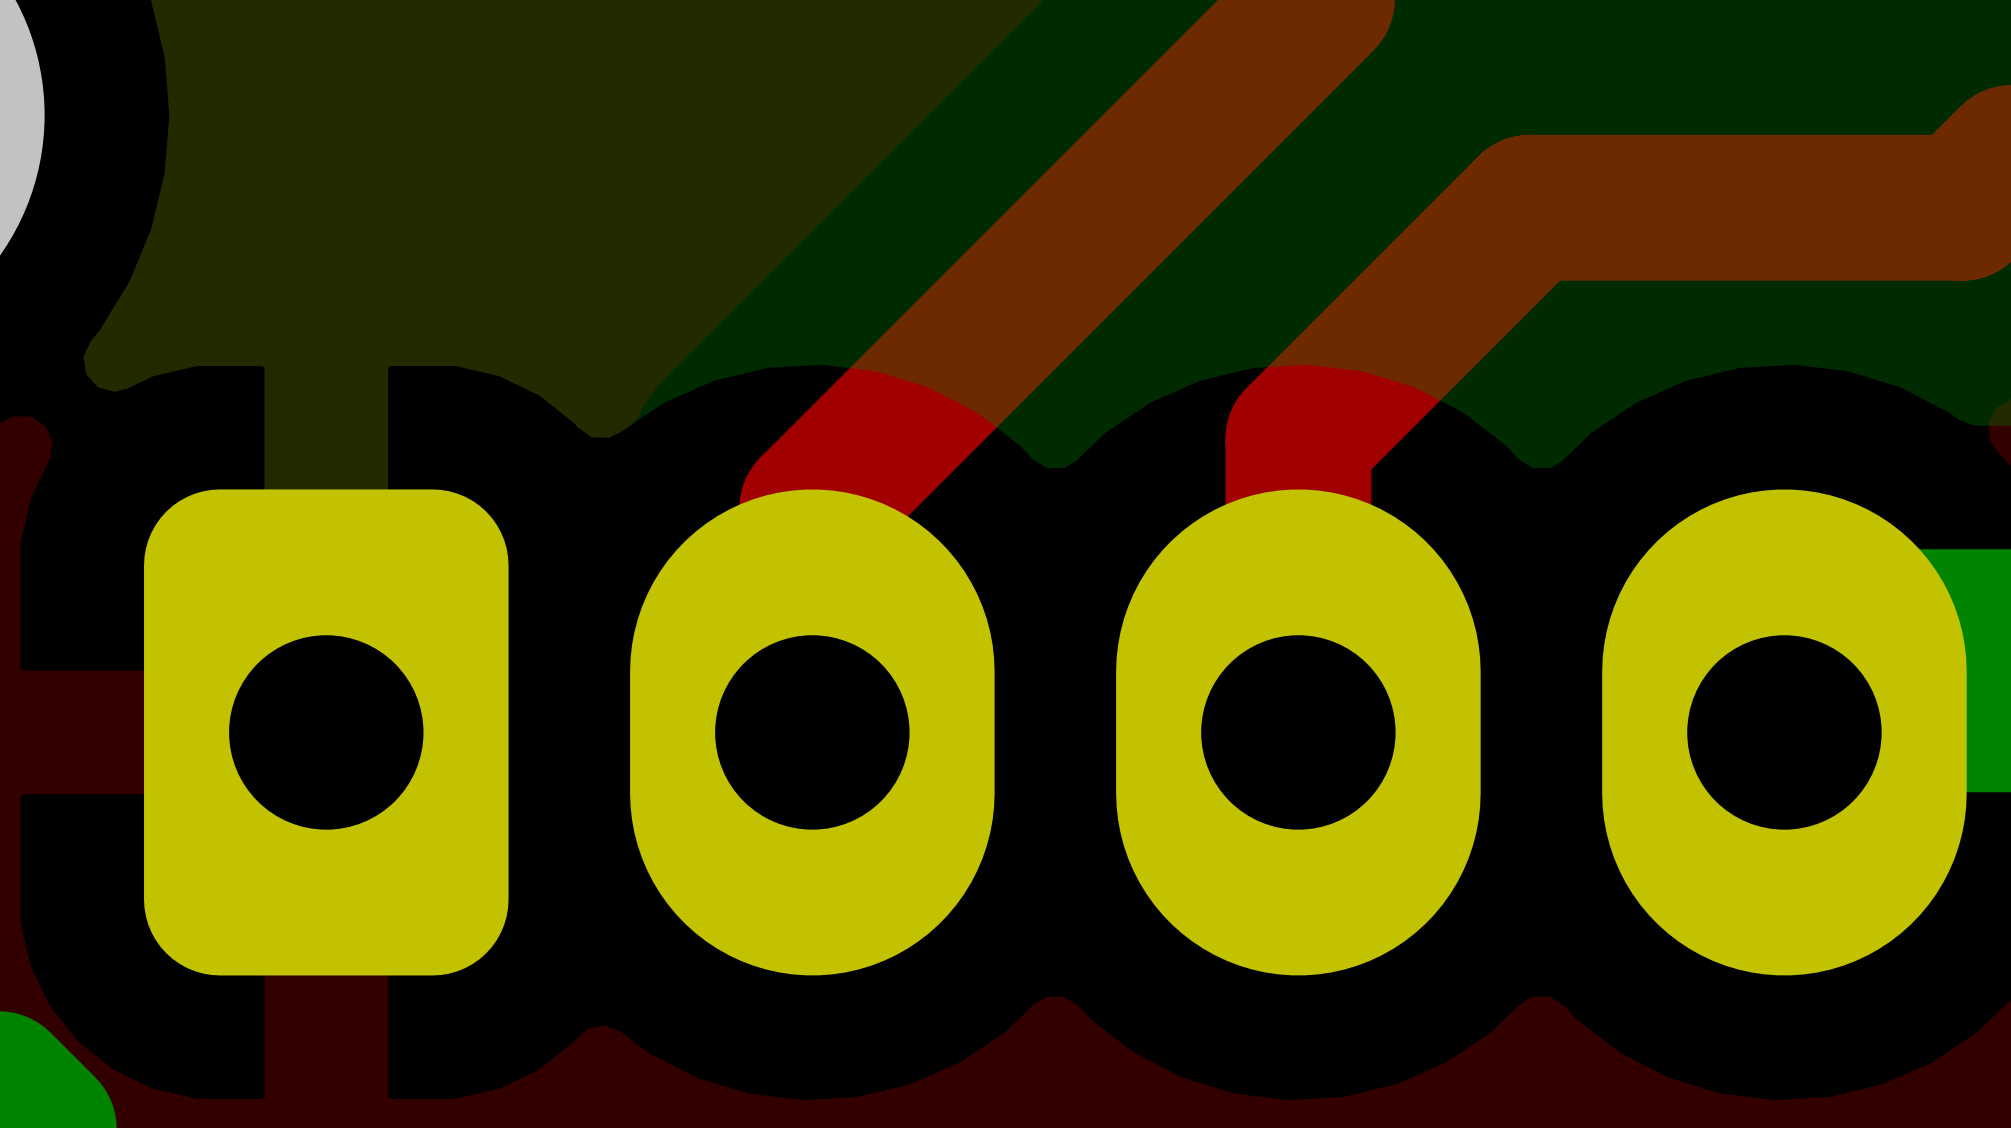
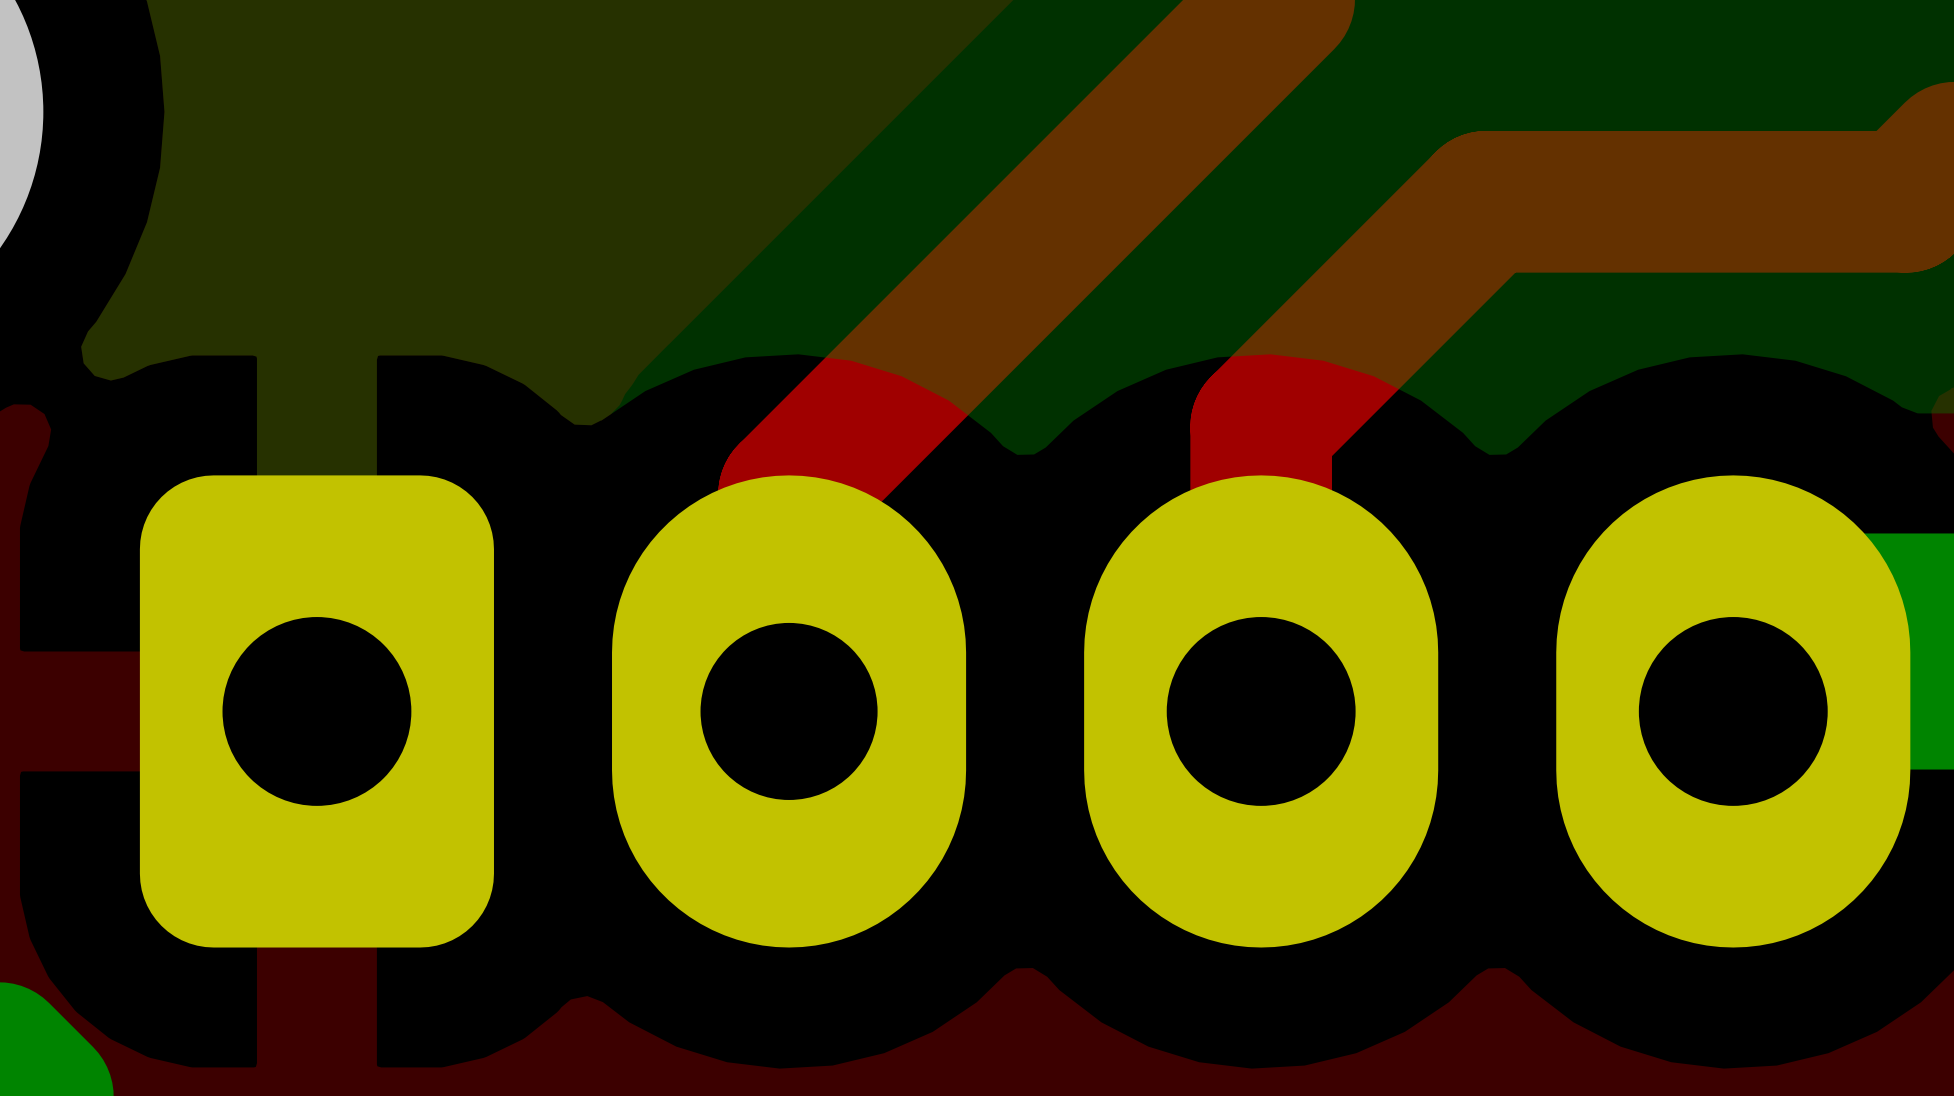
part footprint: [144, 489, 1967, 976] -> [139, 475, 1911, 948]

